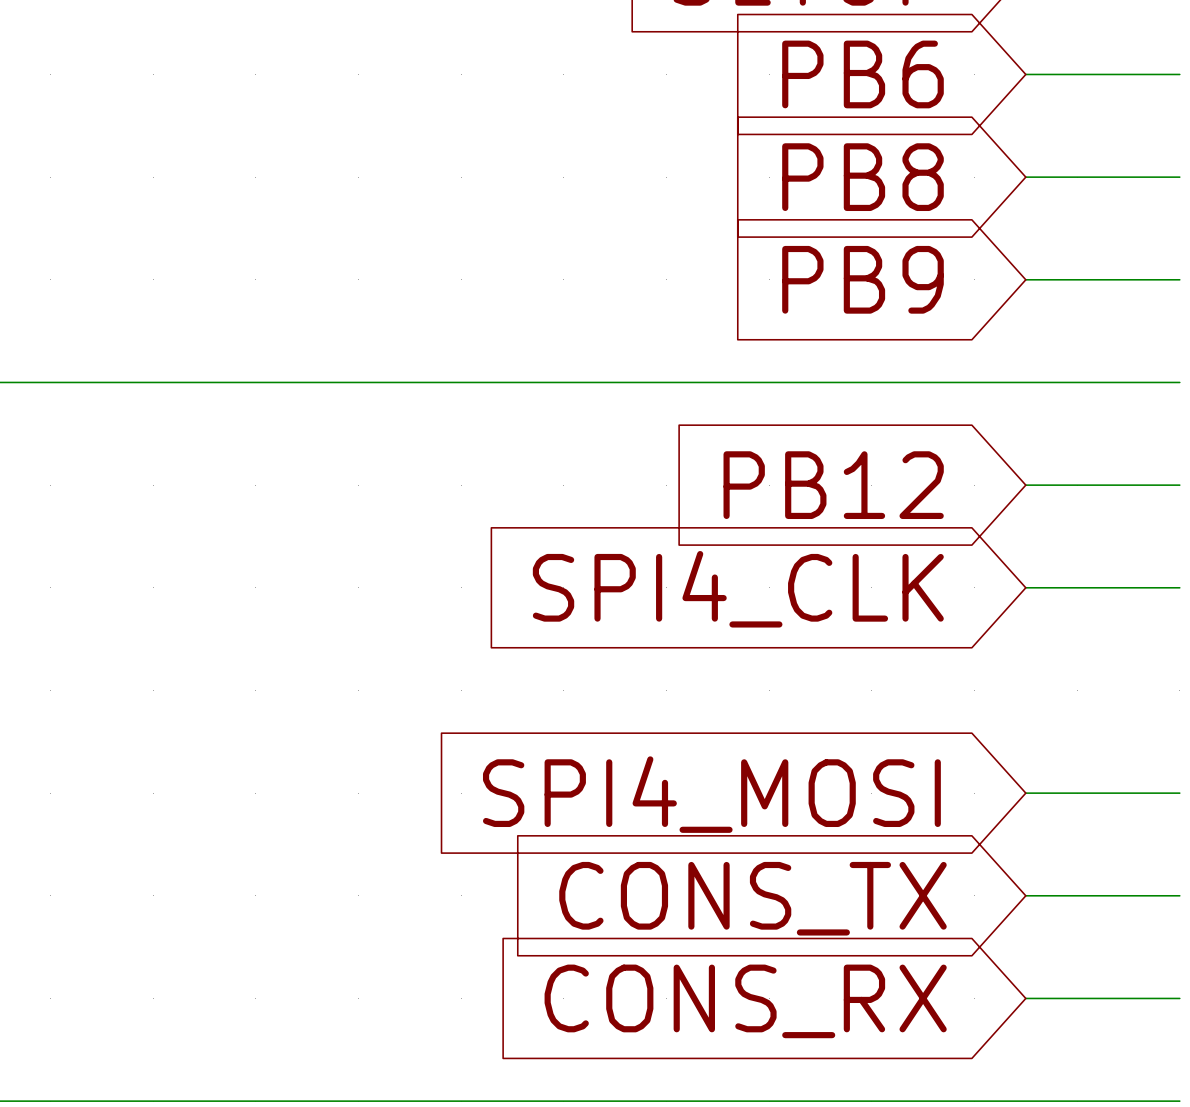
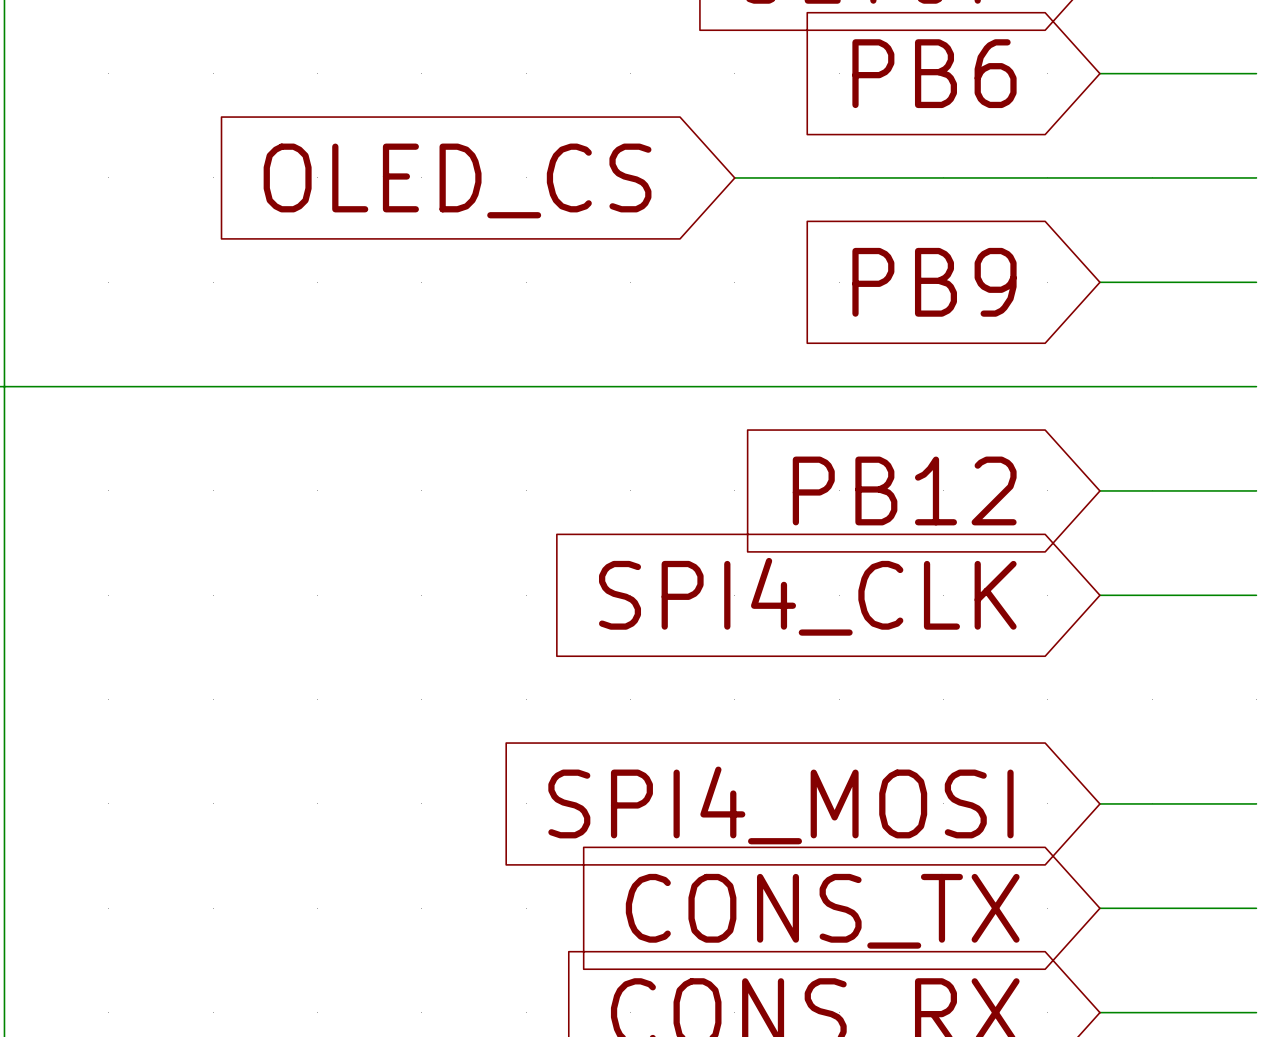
wire: none -> (734, 177) (1099, 177)
global label: PB8 (862, 177) -> none
global label: none -> OLED_CS (457, 180)

